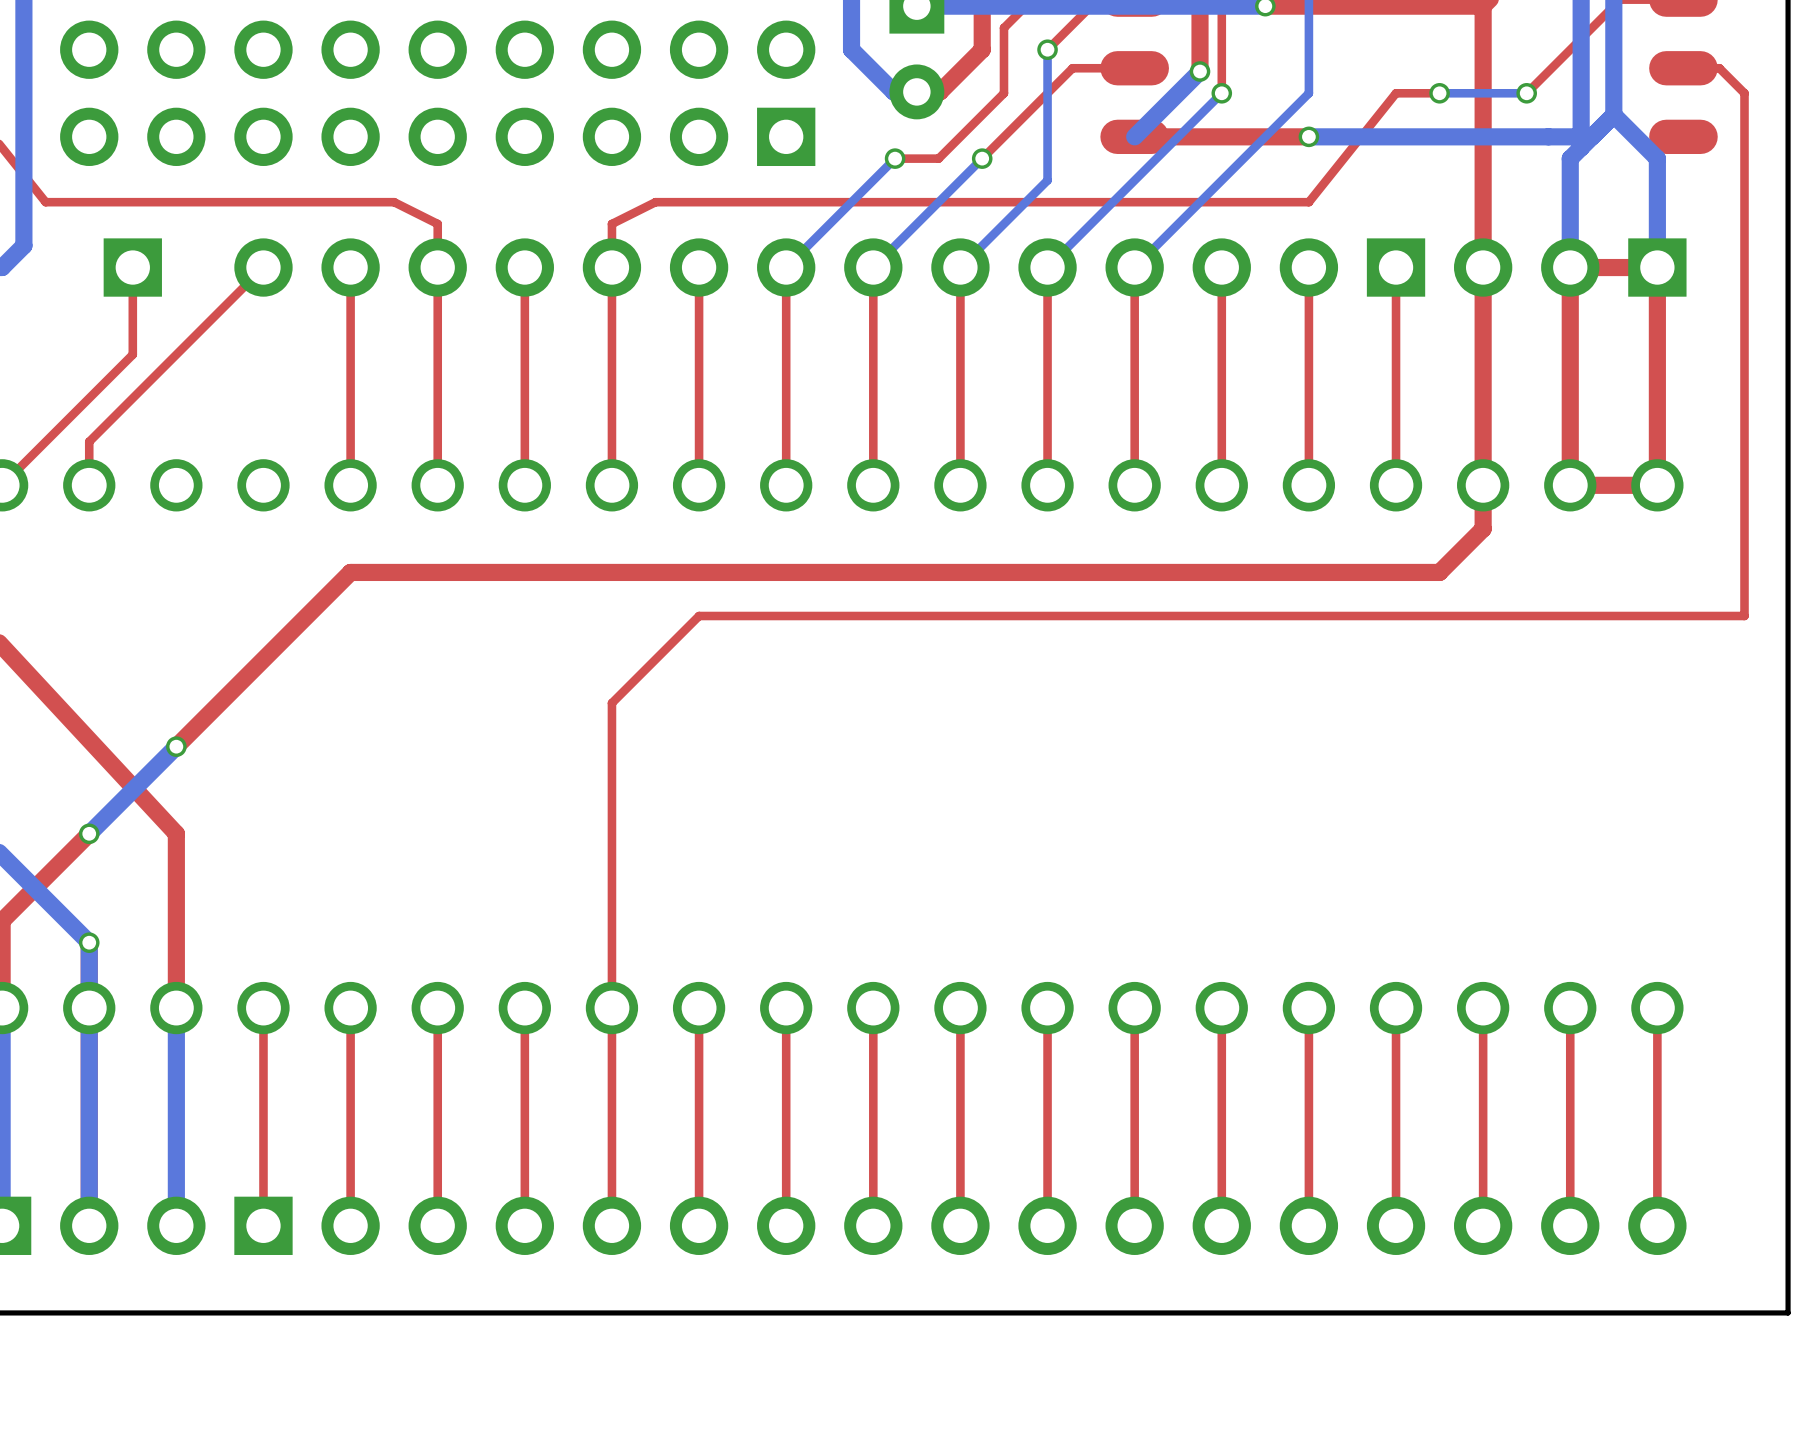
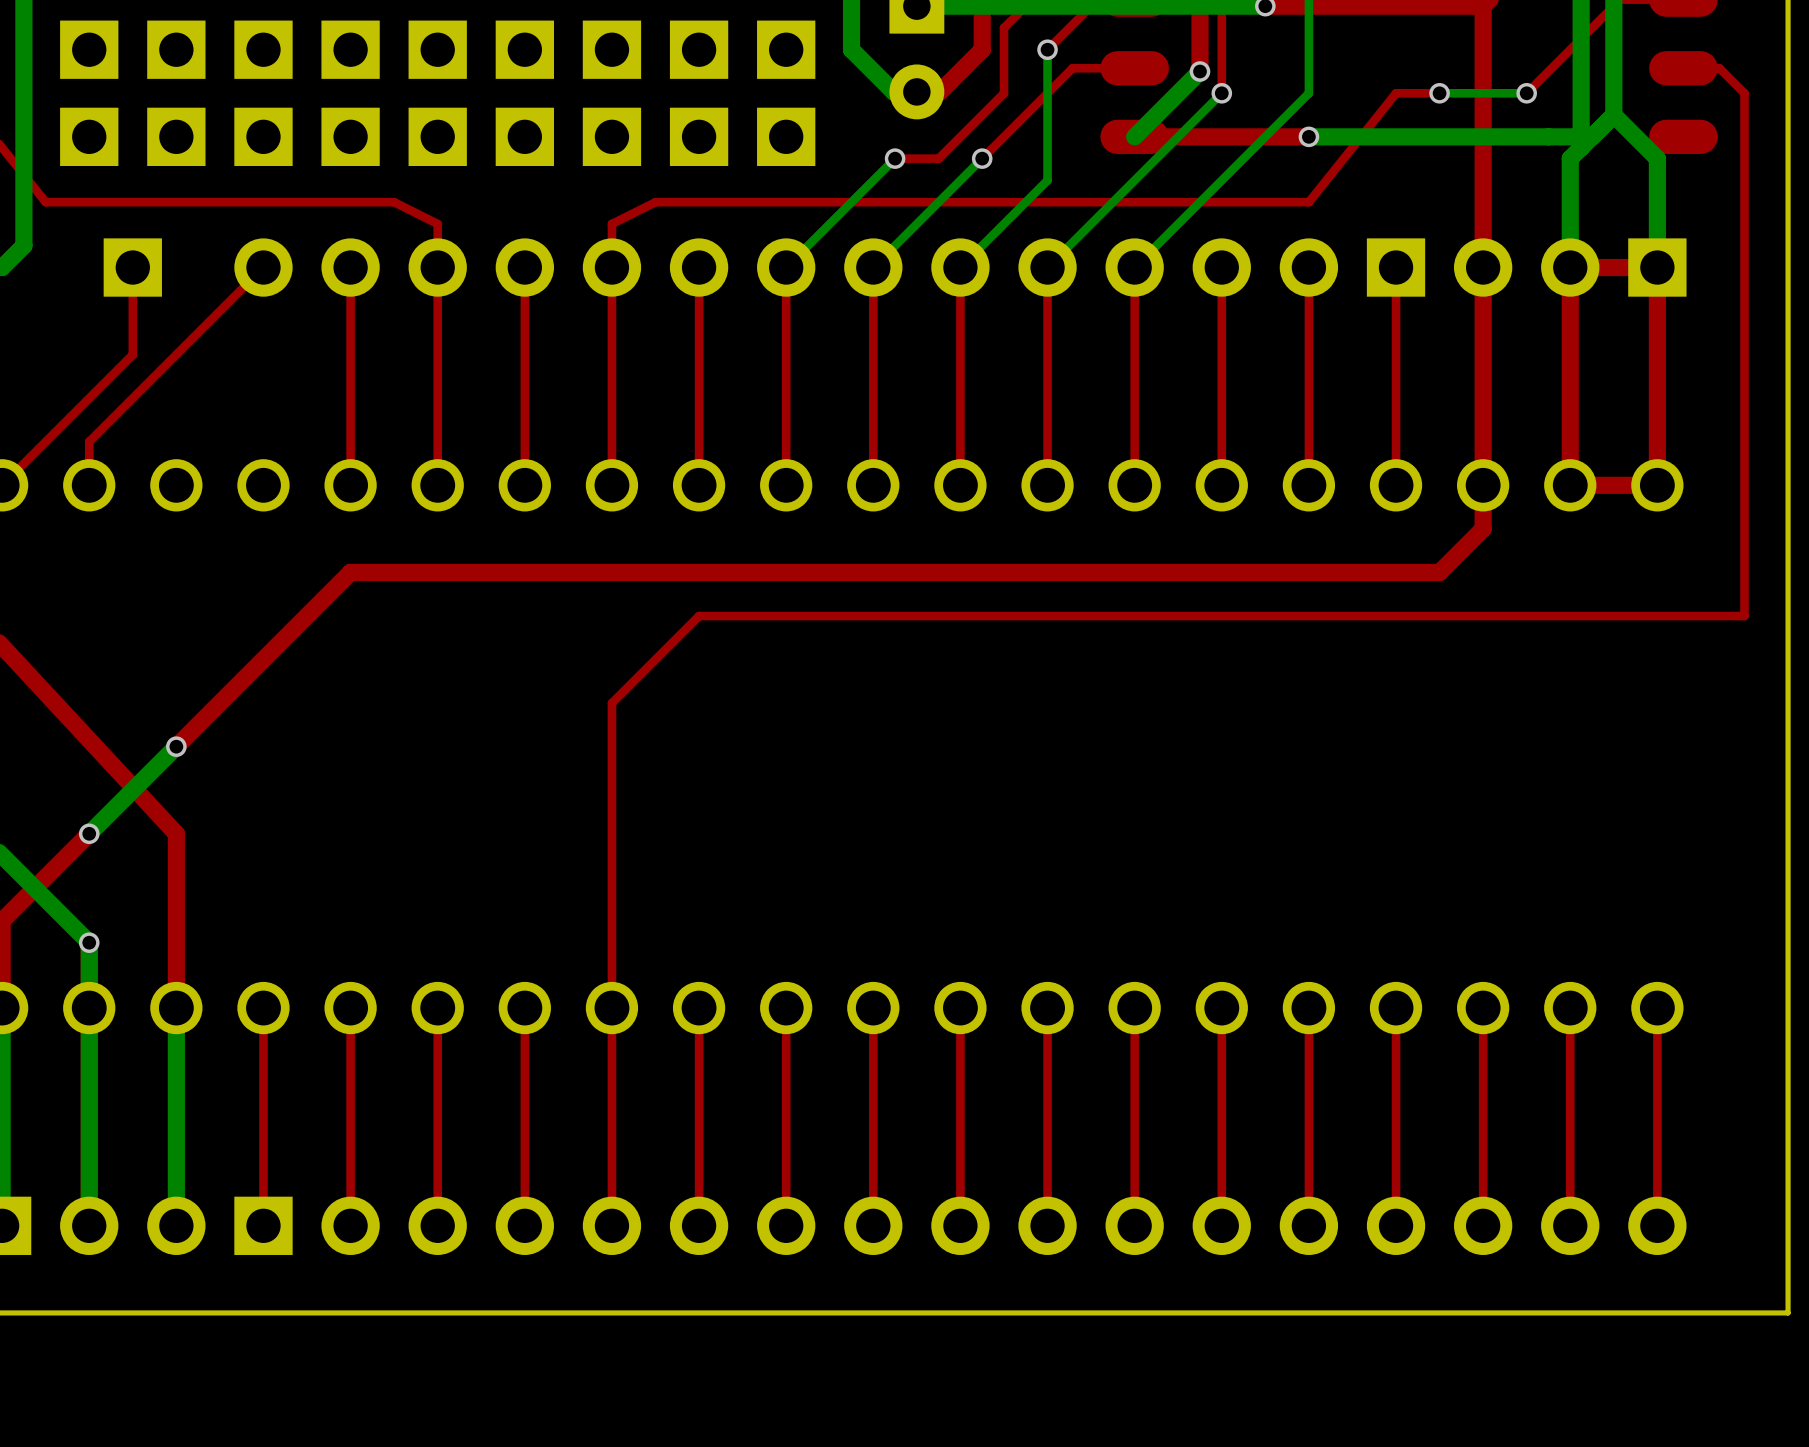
part: none -> (89, 49)
part: none -> (176, 49)
part: none -> (263, 49)
part: none -> (350, 49)
part: none -> (437, 49)
part: none -> (524, 49)
part: none -> (611, 49)
part: none -> (699, 49)
part: none -> (786, 49)
part: (437, 93) -> none
part: none -> (89, 136)
part: none -> (176, 136)
part: none -> (263, 136)
part: none -> (350, 136)
part: none -> (437, 136)
part: none -> (524, 136)
part: none -> (611, 136)
part: none -> (699, 136)

